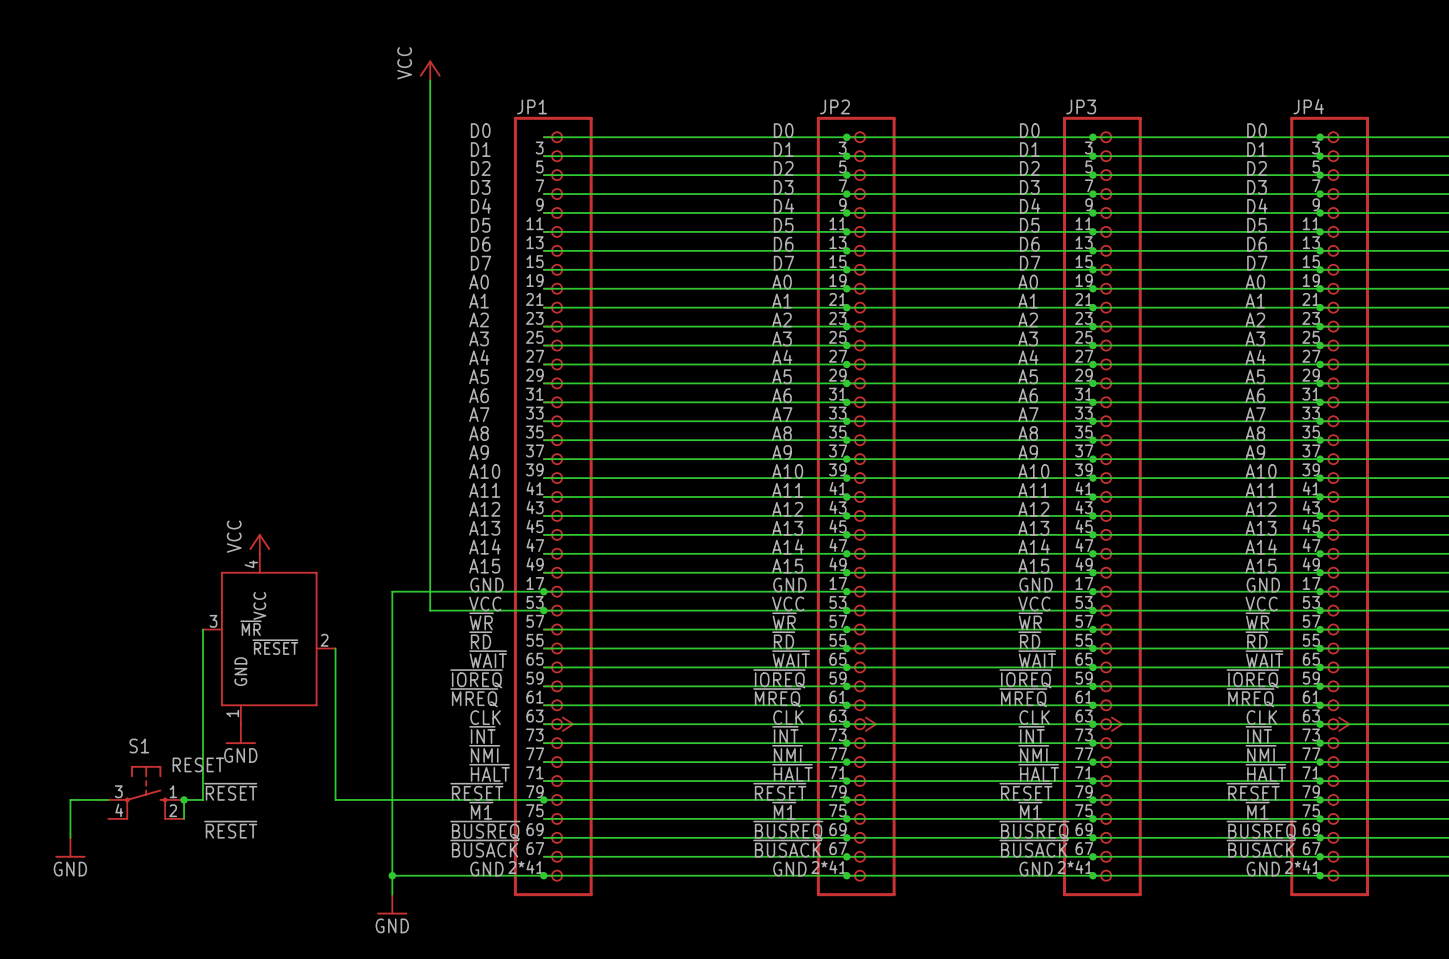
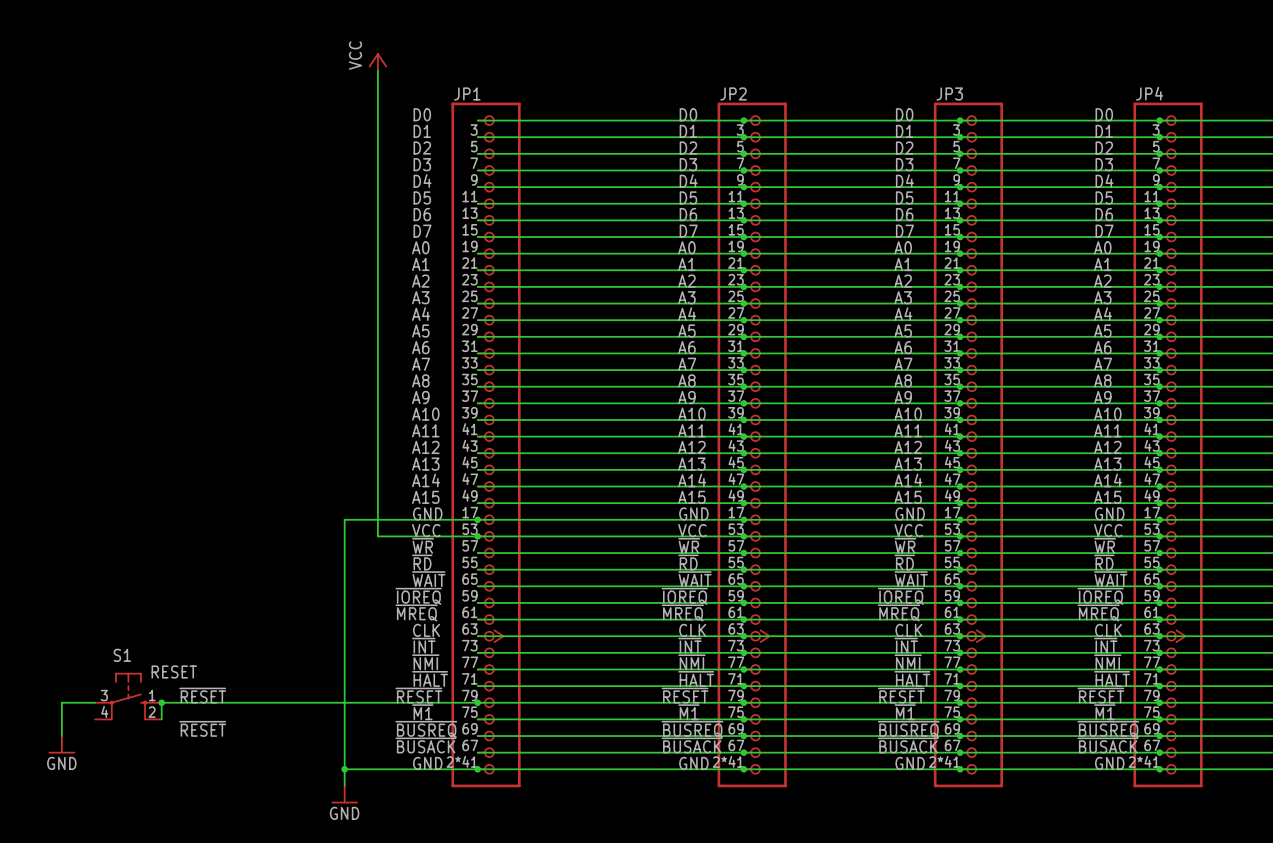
power symbol: VCC (259, 543) -> none
wire: (202, 629) (202, 799) -> none
part: (269, 639) -> none
wire: (335, 648) (335, 799) -> (178, 702) (294, 702)
power symbol: GND (240, 734) -> none

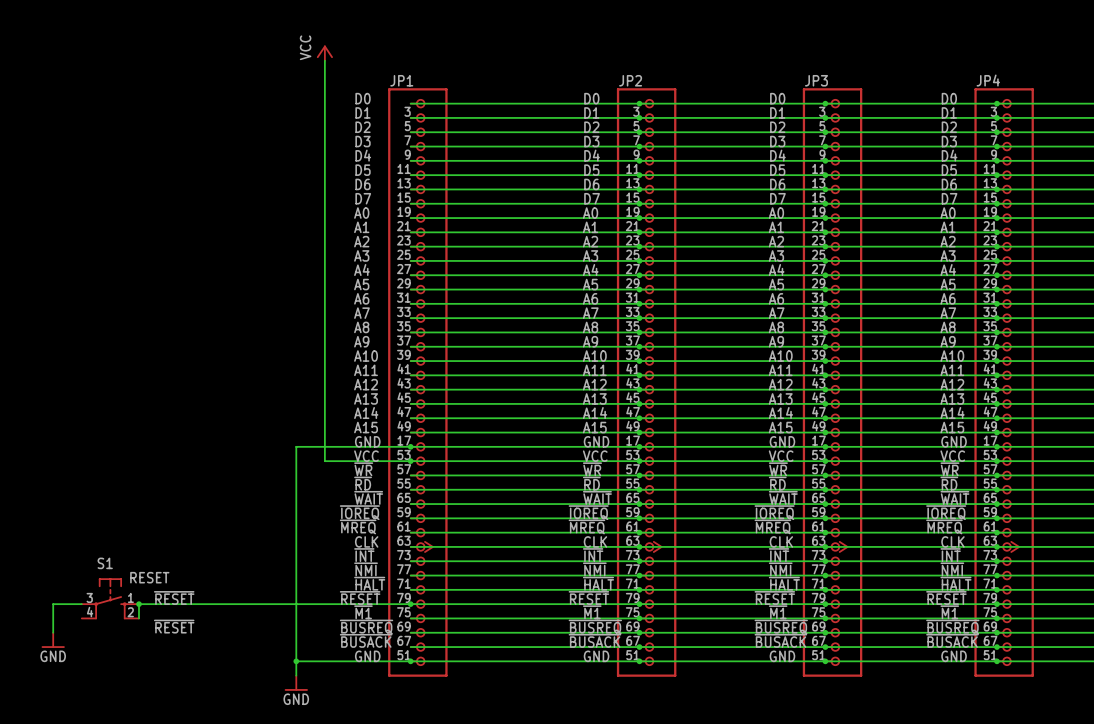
JP1 pin number: 2*41 (462, 761) -> 51 (404, 655)
JP2 pin number: 2*41 (728, 761) -> 51 (632, 655)
JP3 pin number: 2*41 (944, 761) -> 51 (818, 655)
JP4 pin number: 2*41 (1144, 761) -> 51 (990, 655)

